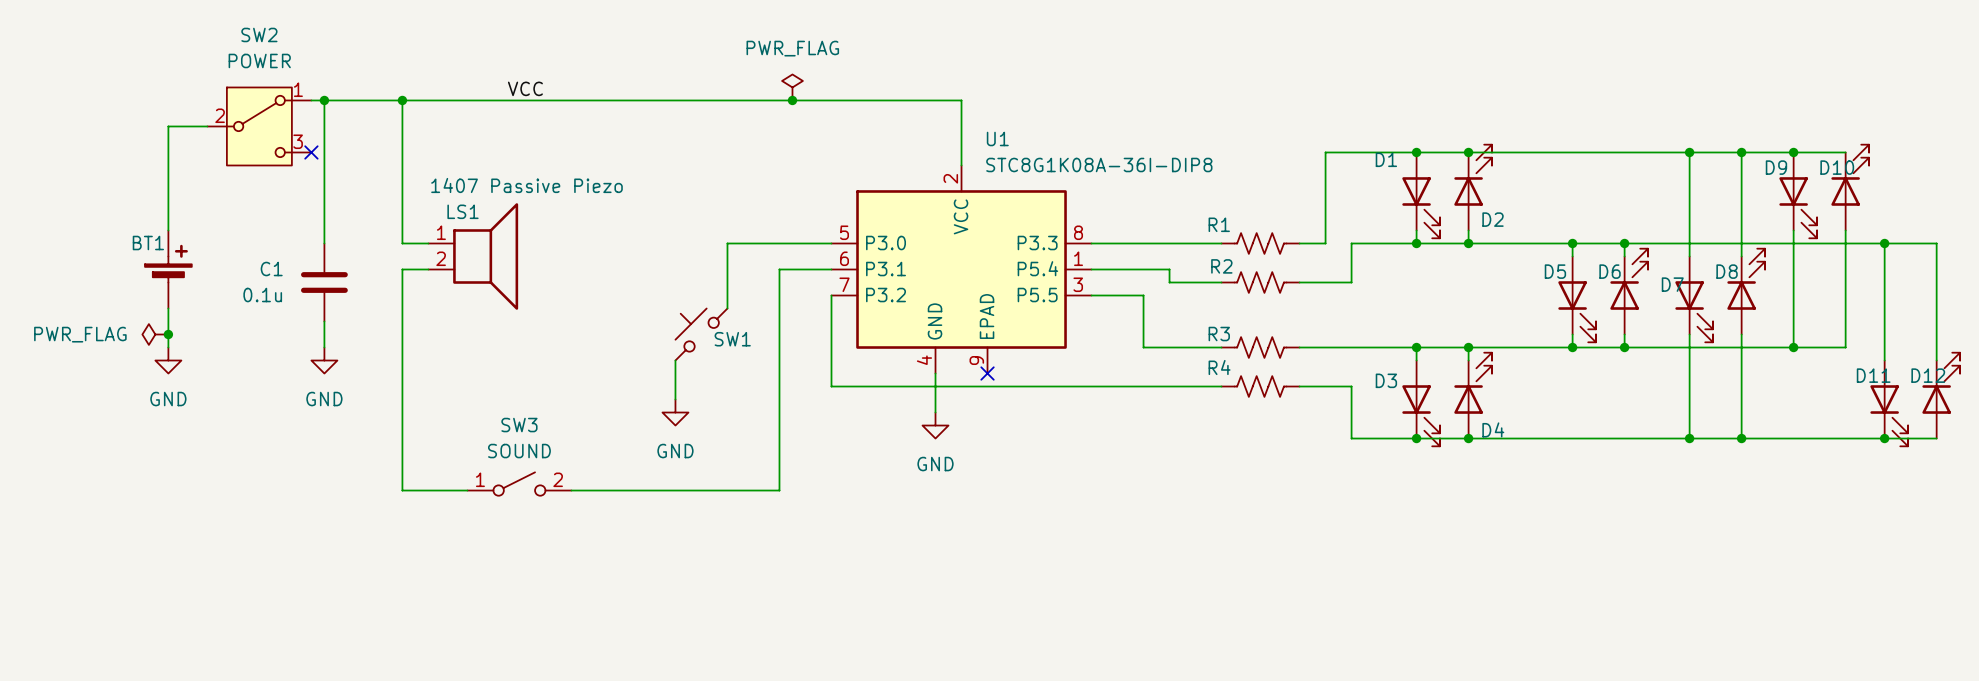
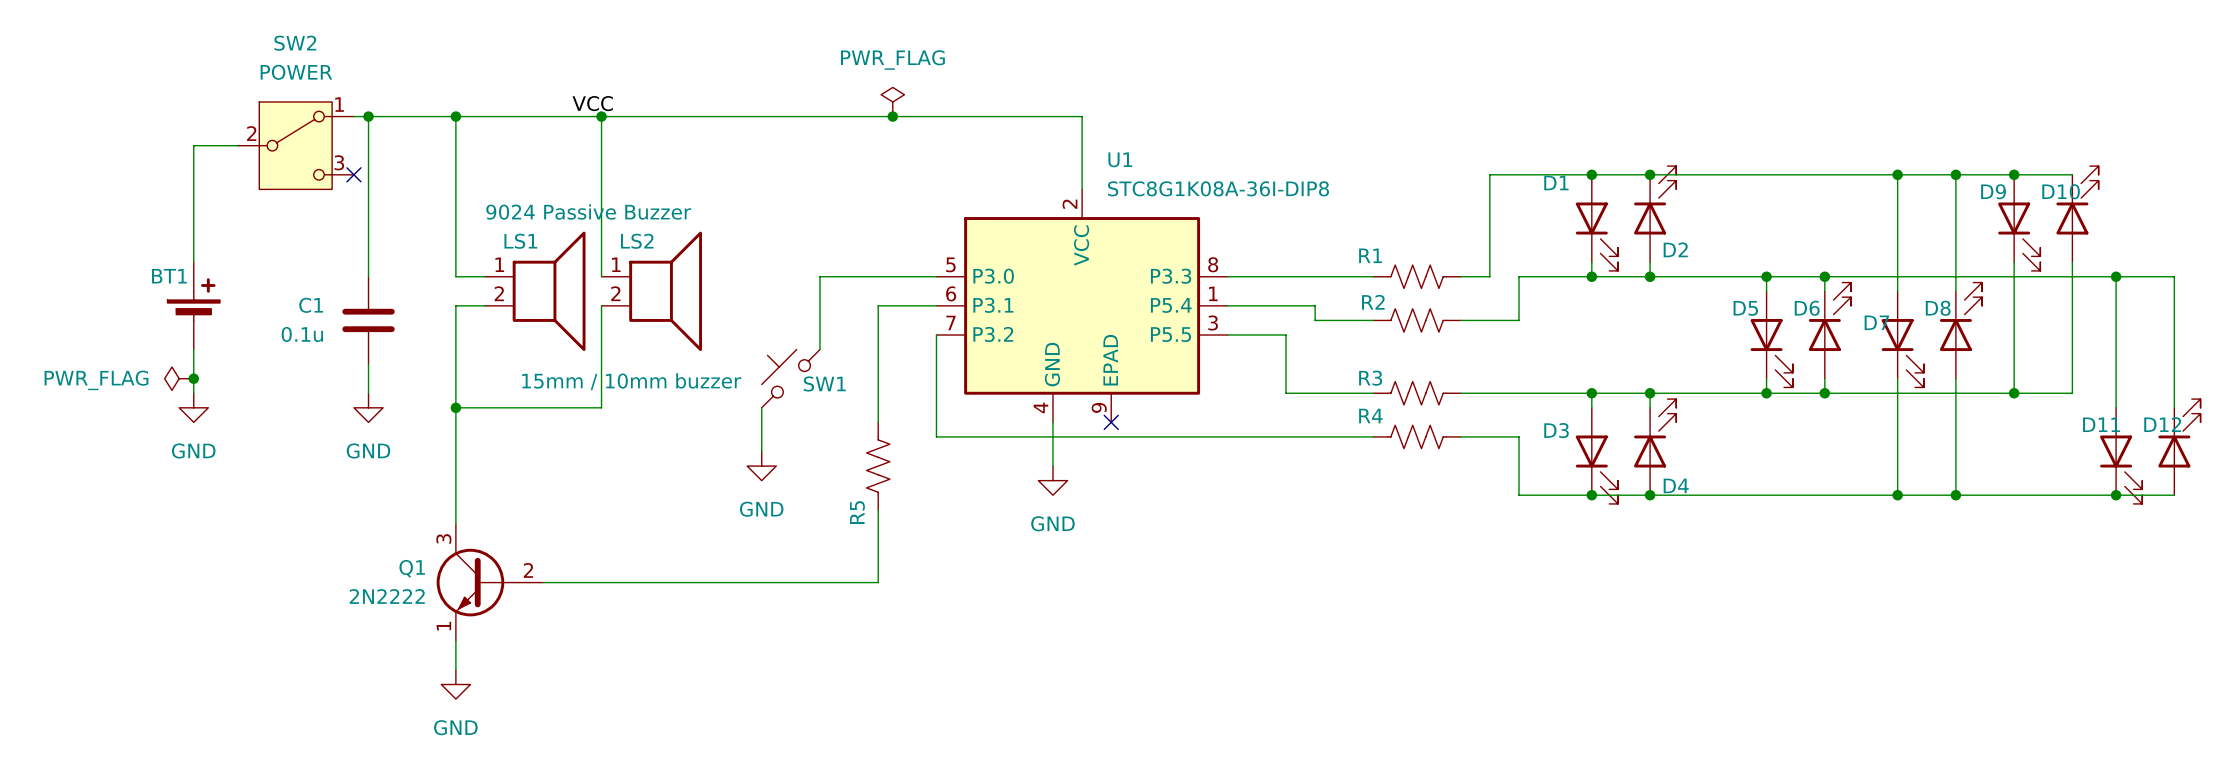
wire: none -> (601, 116) (601, 276)
junction: none -> (601, 116)
LS1 value: 1407 Passive Piezo (526, 185) -> 9024 Passive Buzzer (588, 211)
LS2: none -> 15mm / 10mm buzzer (651, 291)
wire: none -> (601, 305) (601, 407) (455, 407)
junction: none -> (455, 407)
R5: none -> (878, 466)
wire: (402, 464) (402, 490) (467, 490) -> none
SW3: SOUND (519, 484) -> none
wire: (571, 490) (779, 490) -> (543, 582) (878, 582) (878, 553)
Q1: none -> 2N2222 (489, 582)
wire: none -> (455, 640) (455, 669)
power symbol: none -> GND (455, 684)

